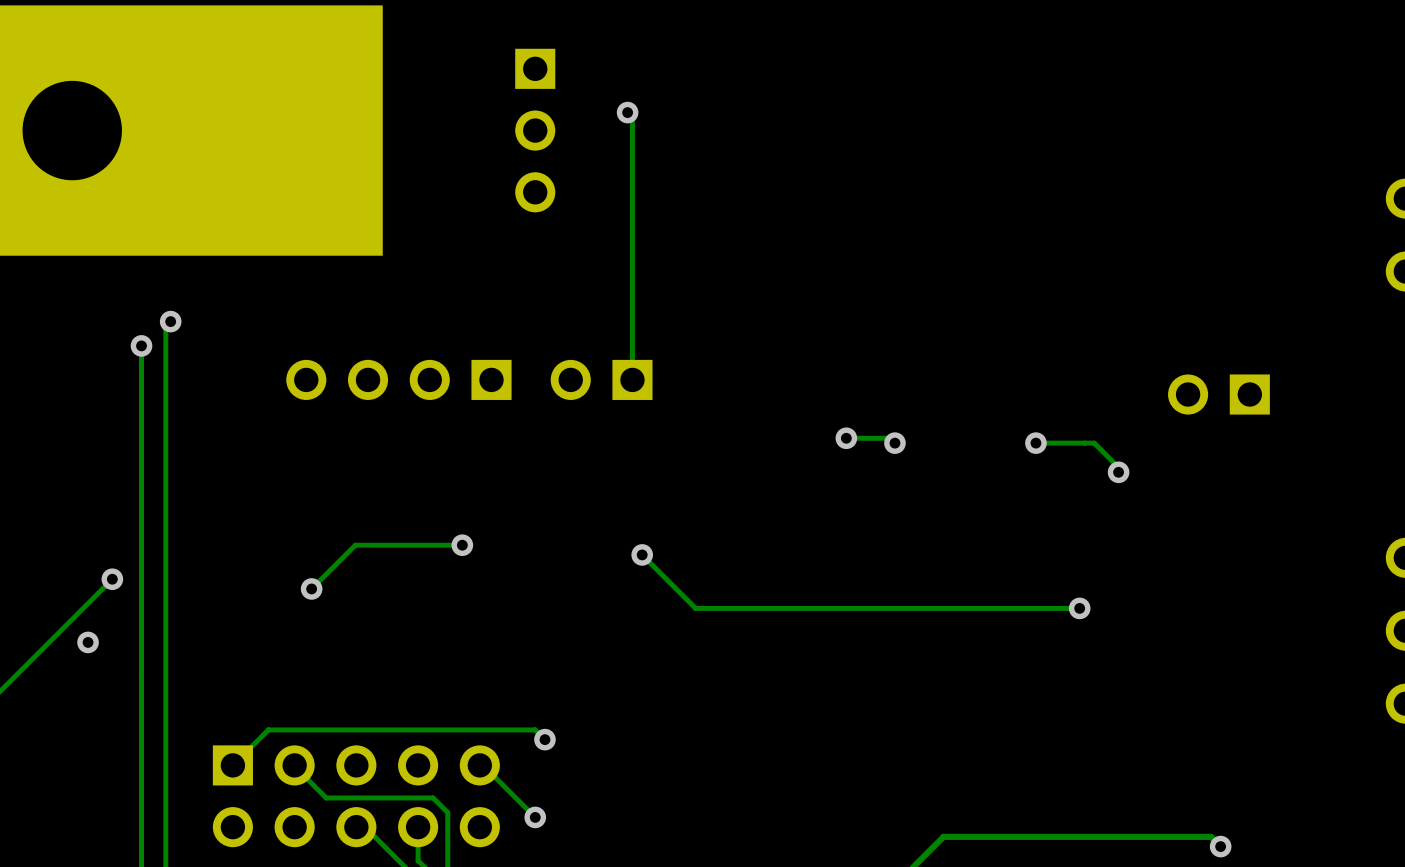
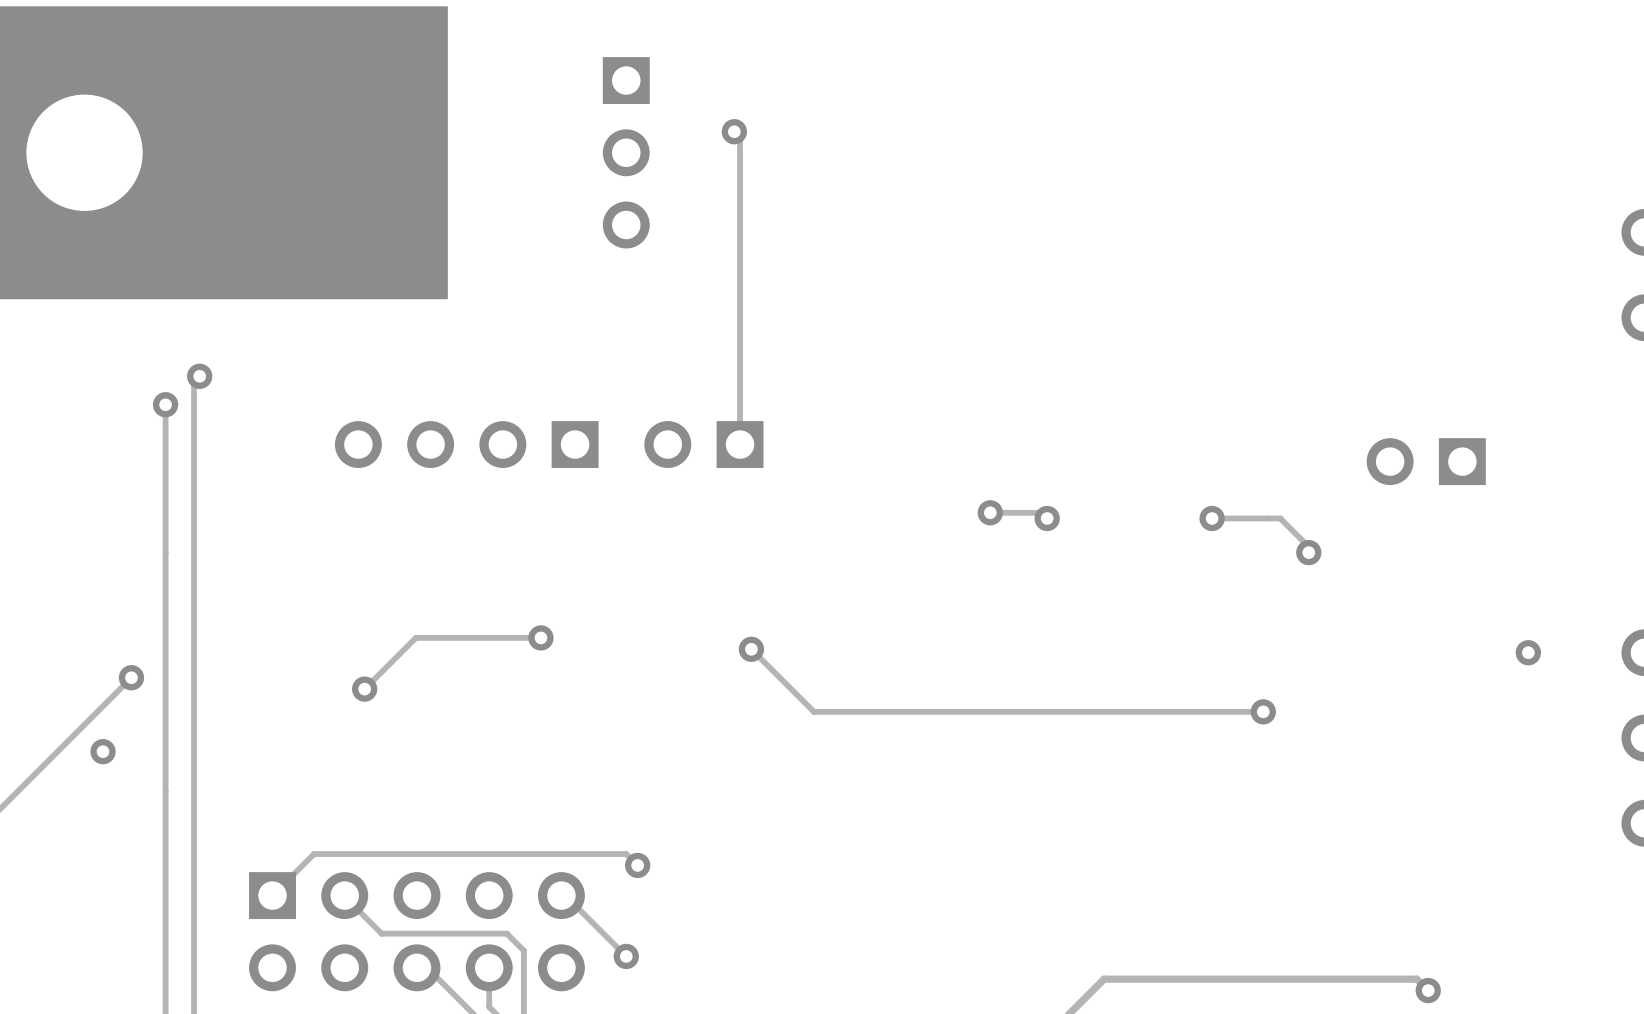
via: none -> (1528, 652)

